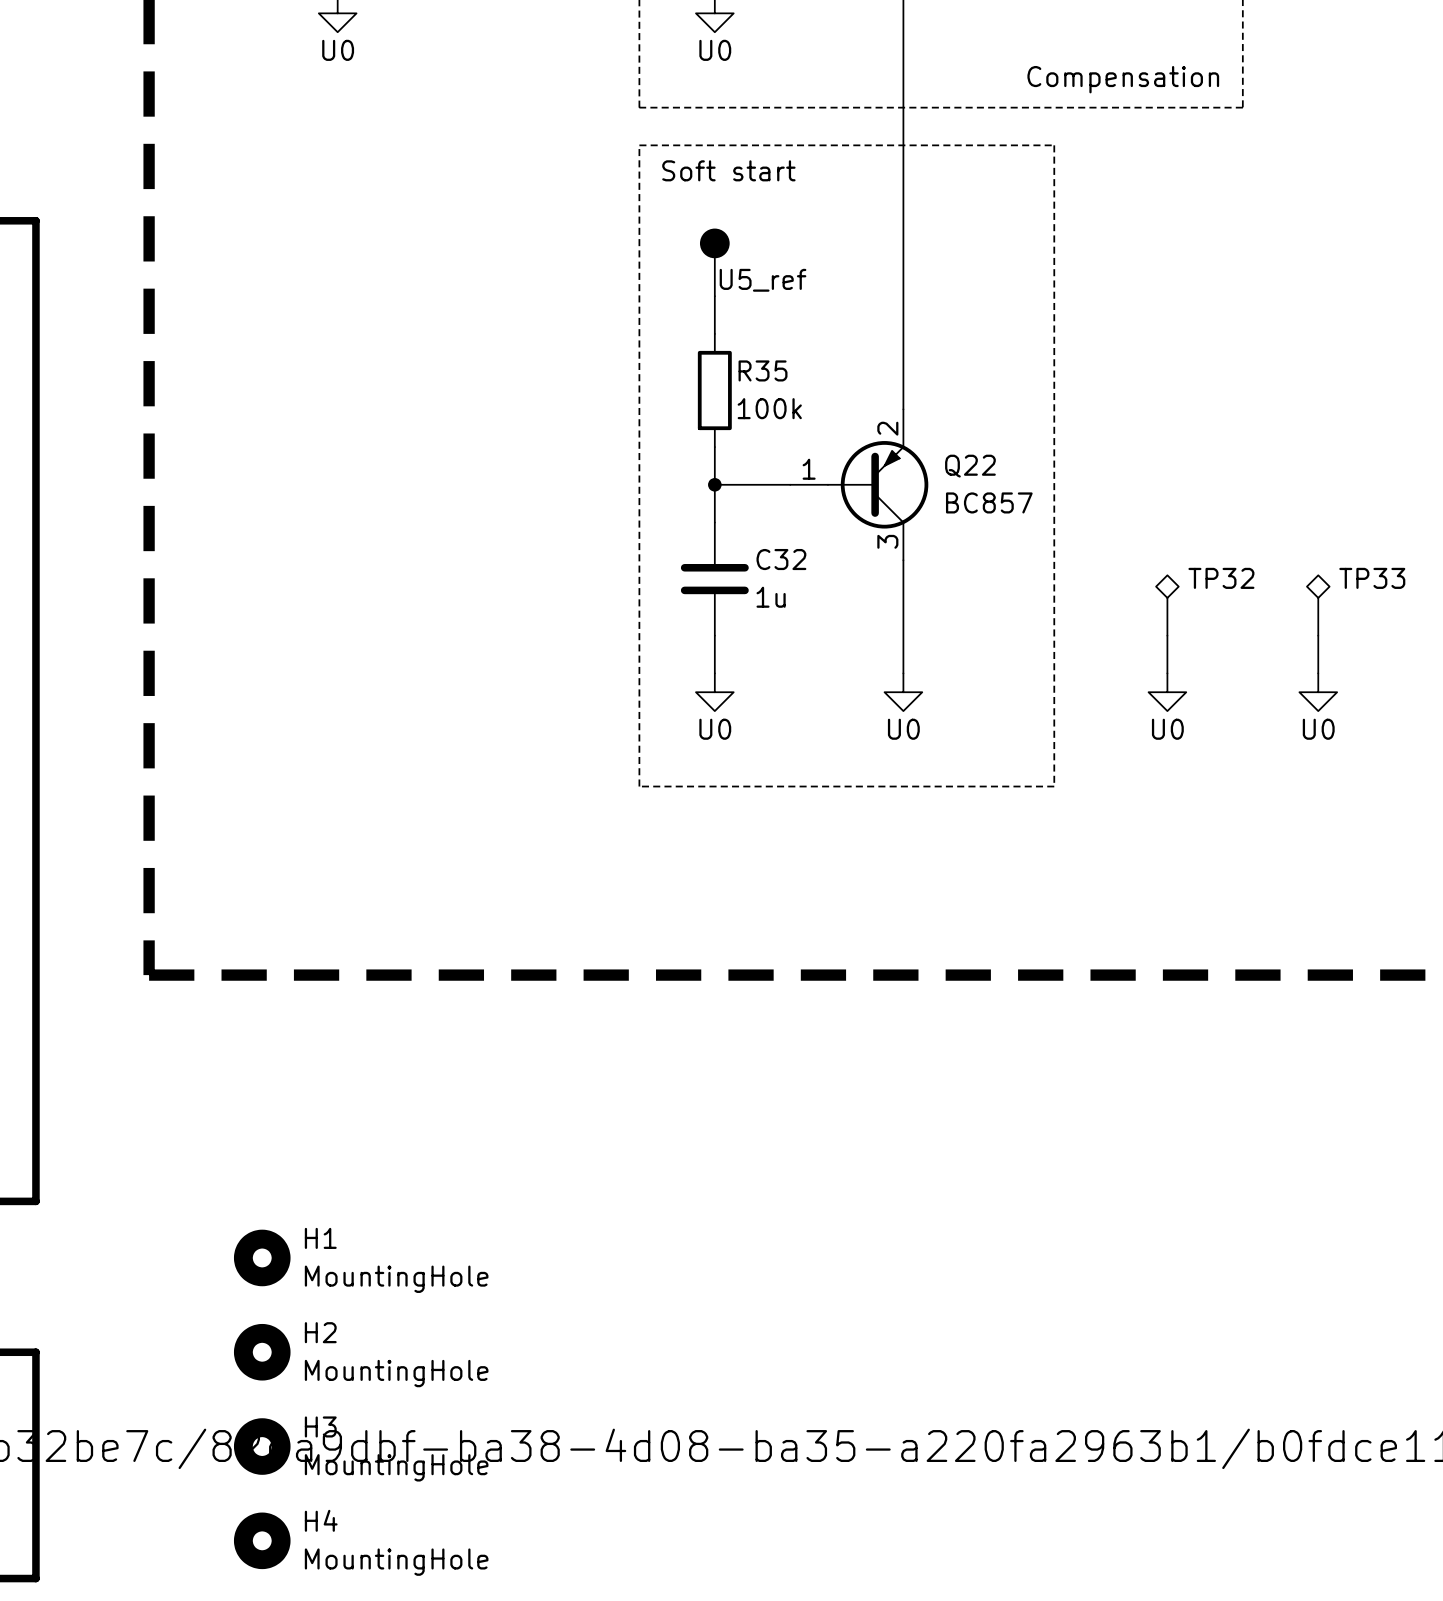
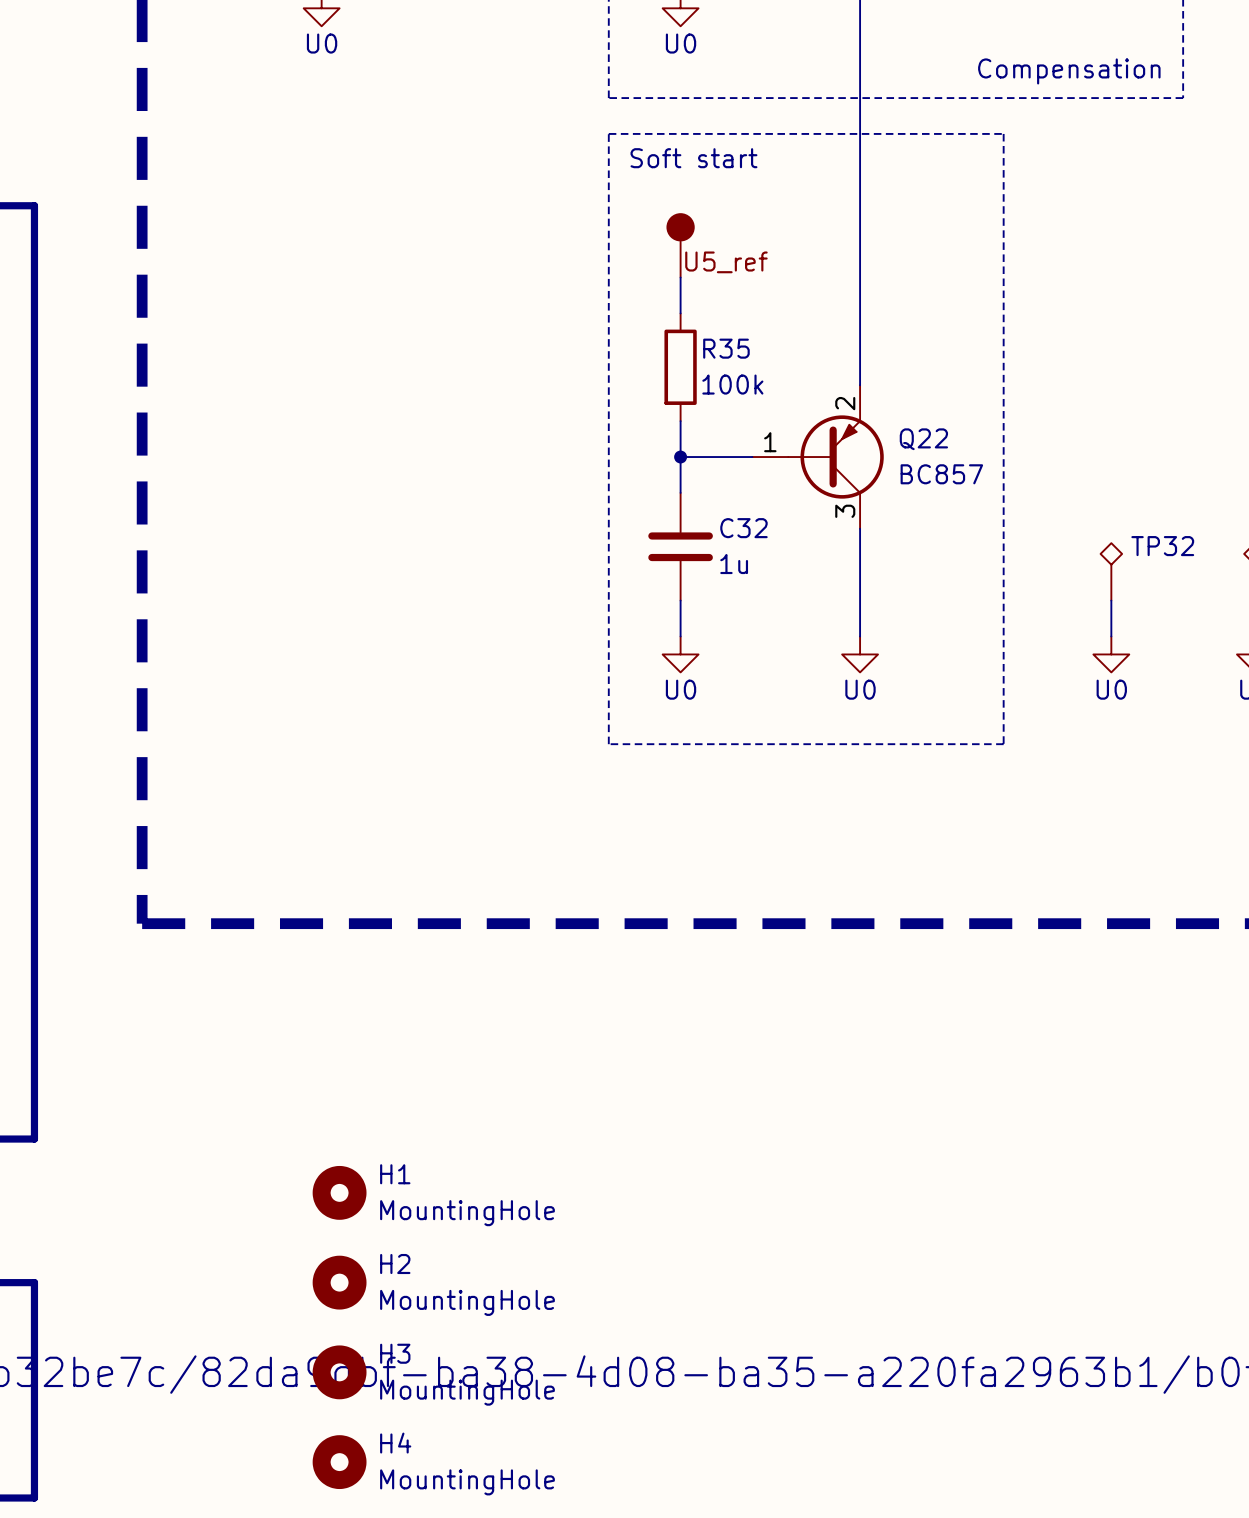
H1 position: (262, 1257) -> (339, 1192)
H2 position: (262, 1352) -> (339, 1282)
H3 position: (262, 1446) -> (339, 1372)
H4 position: (262, 1540) -> (339, 1462)

